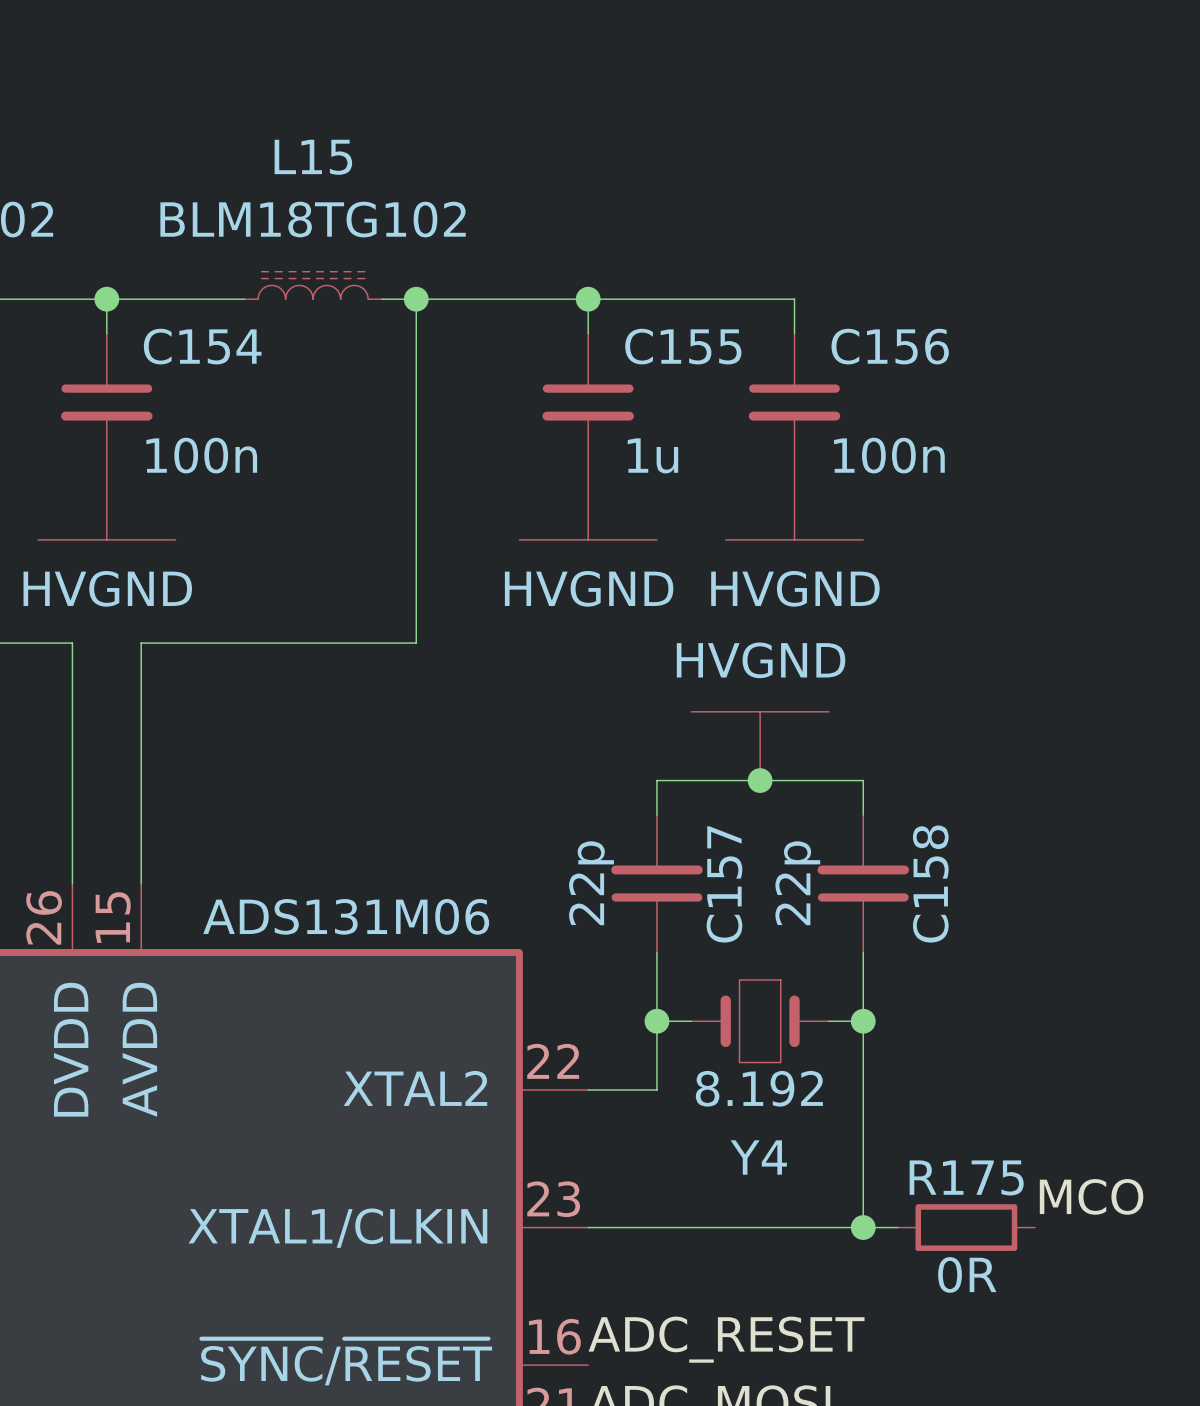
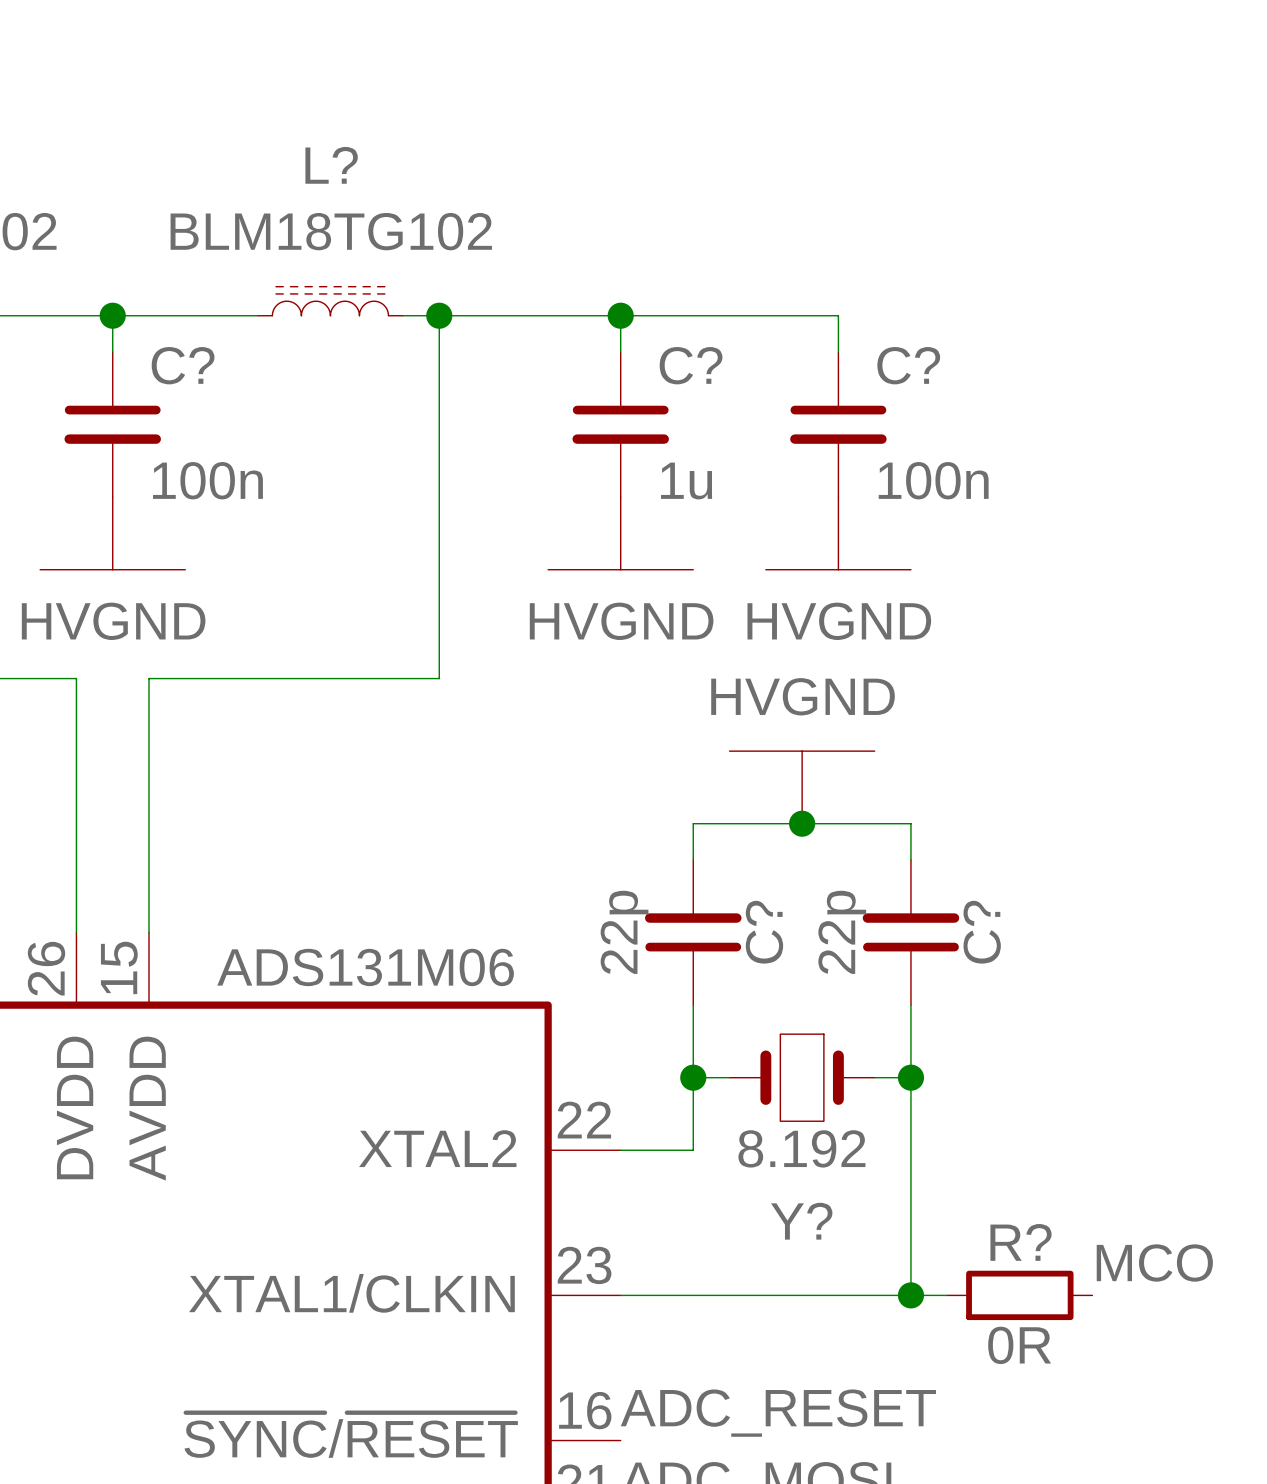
L15 name: L15 (313, 157) -> L? (331, 165)
C154 name: C154 (202, 346) -> C? (183, 365)
C155 name: C155 (683, 346) -> C? (691, 365)
C156 name: C156 (890, 346) -> C? (908, 365)
C157 name: C157 (724, 884) -> C? (764, 932)
C158 name: C158 (930, 884) -> C? (982, 932)
Y4 name: Y4 (758, 1157) -> Y? (801, 1221)
R175 name: R175 (966, 1177) -> R? (1021, 1242)

